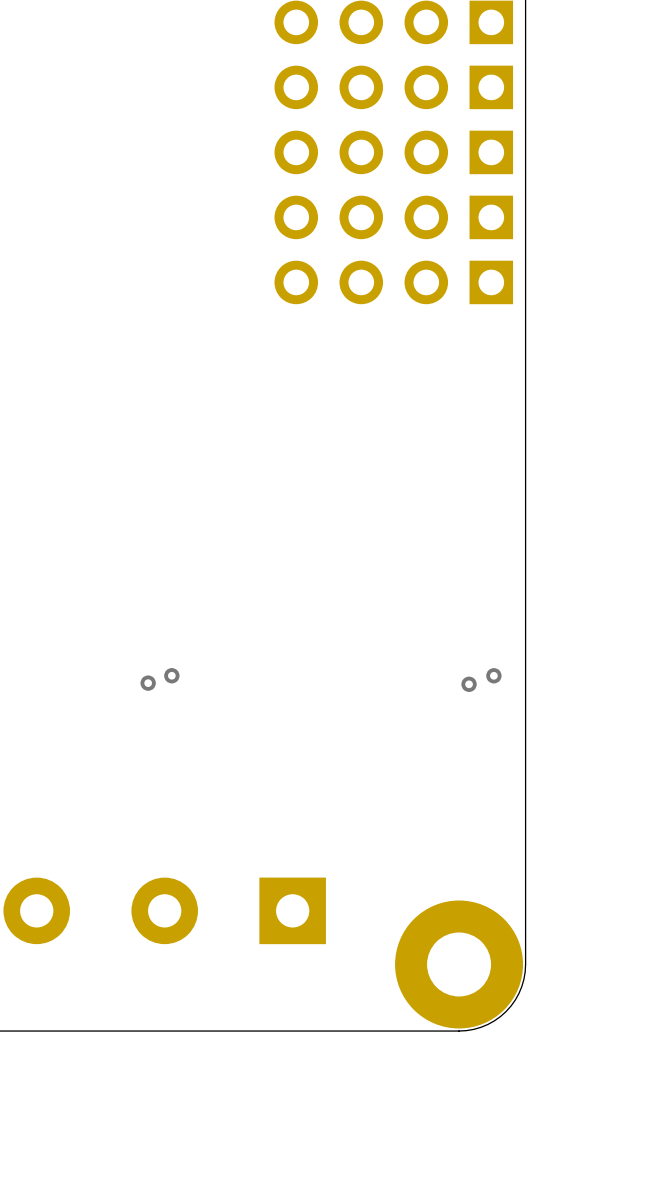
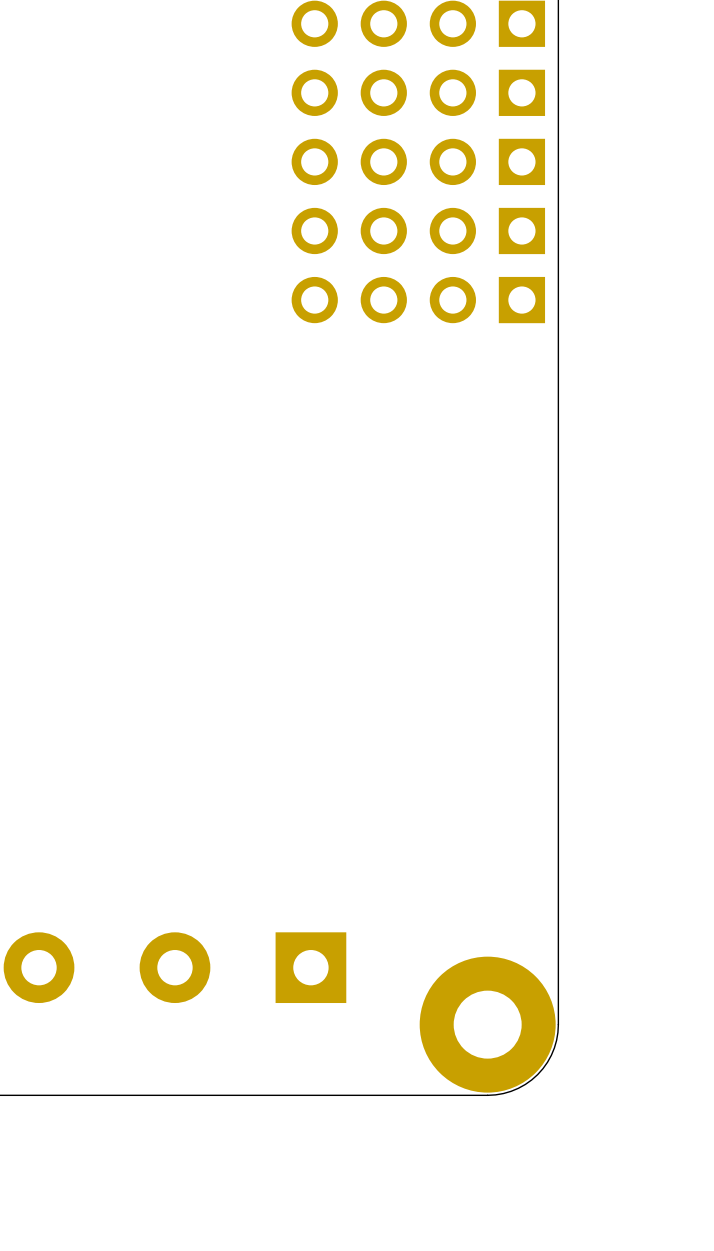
via: (171, 675) -> none
via: (493, 675) -> none
via: (148, 683) -> none
via: (469, 684) -> none

